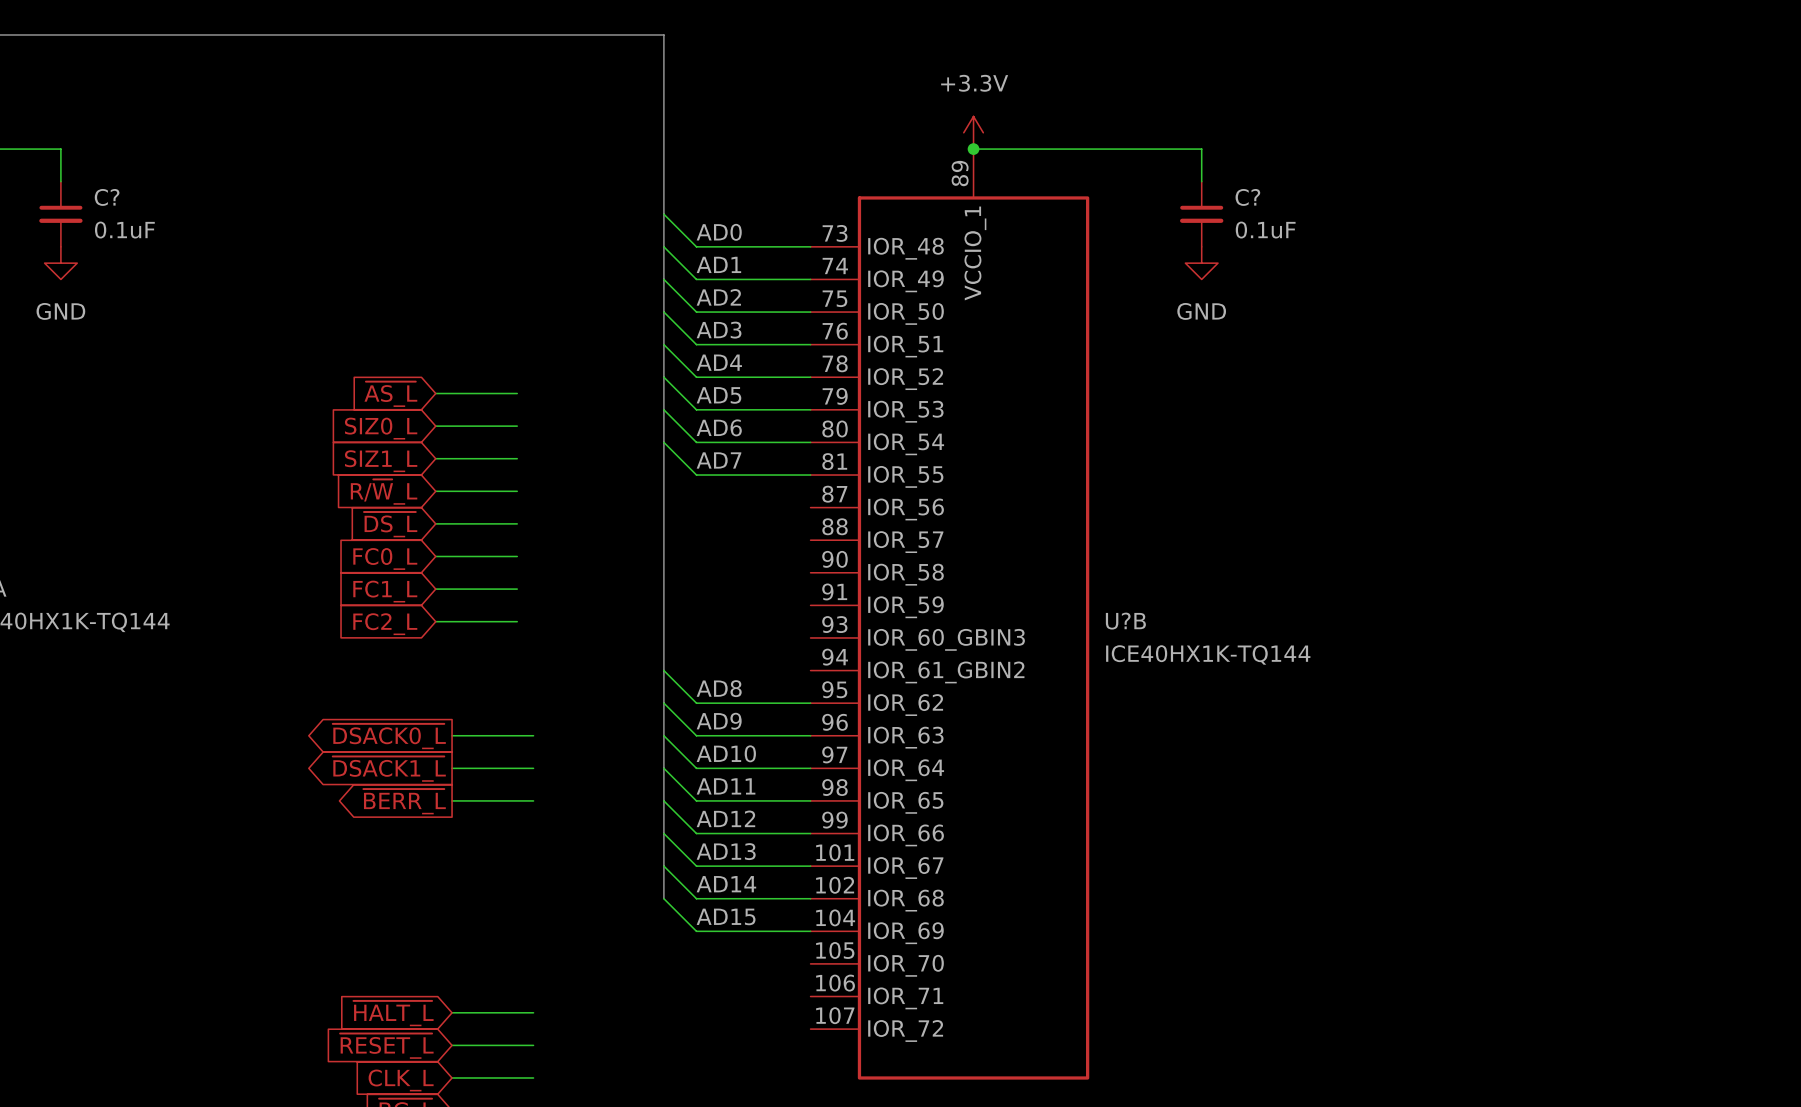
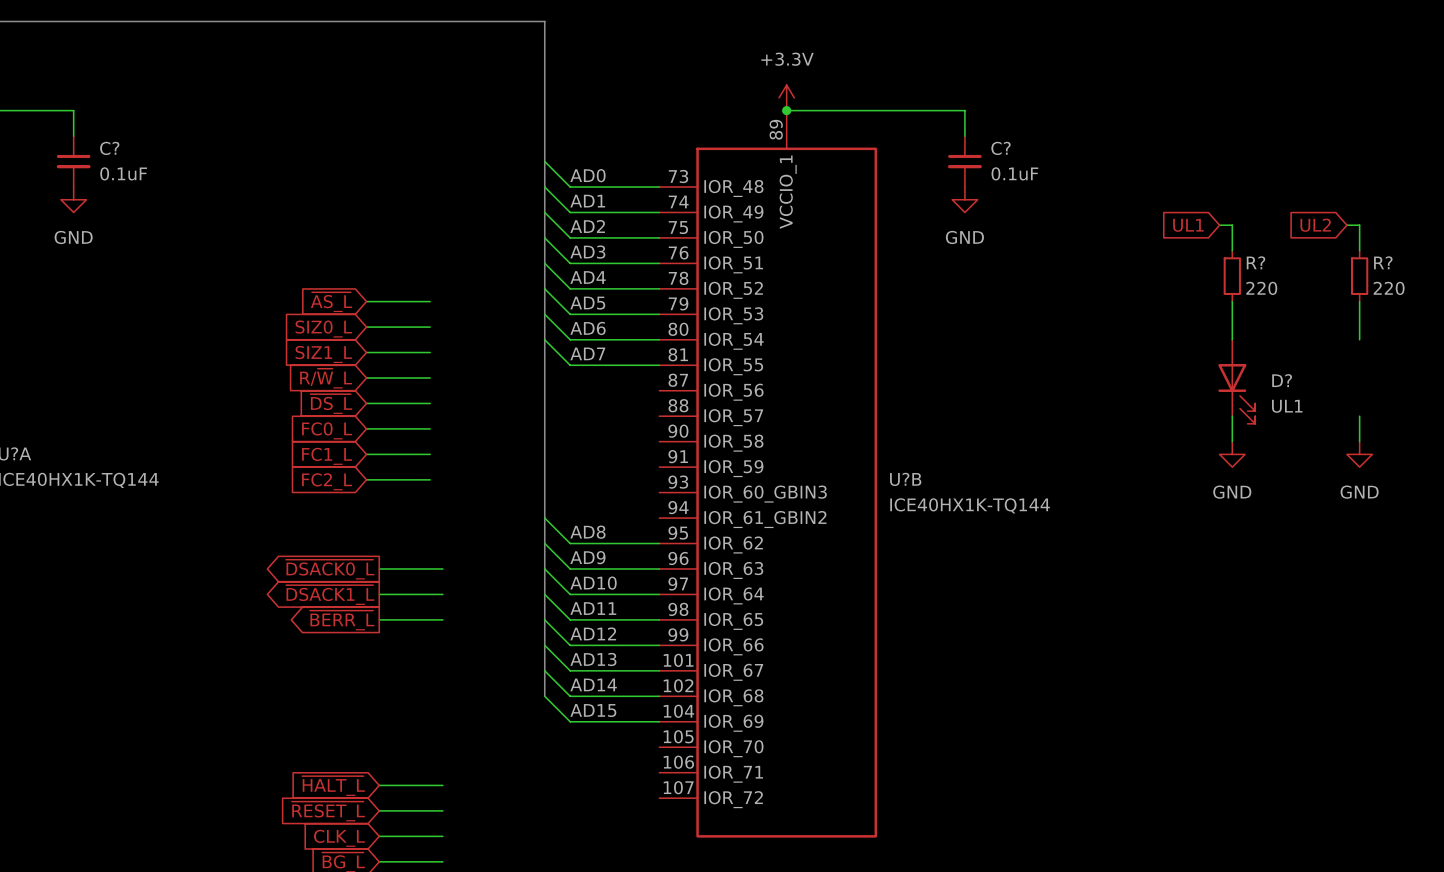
global label: none -> UL1 (1188, 225)
wire: none -> (1219, 225) (1232, 225) (1232, 250)
global label: none -> UL2 (1315, 225)
wire: none -> (1346, 225) (1359, 225) (1359, 250)
R?: none -> 220 (1232, 276)
R?: none -> 220 (1359, 276)
wire: none -> (1232, 301) (1232, 339)
wire: none -> (1359, 301) (1359, 339)
D?: none -> UL1 (1236, 381)
wire: none -> (1232, 416) (1232, 441)
wire: none -> (1359, 416) (1359, 441)
power symbol: none -> GND (1232, 454)
power symbol: none -> GND (1359, 454)

